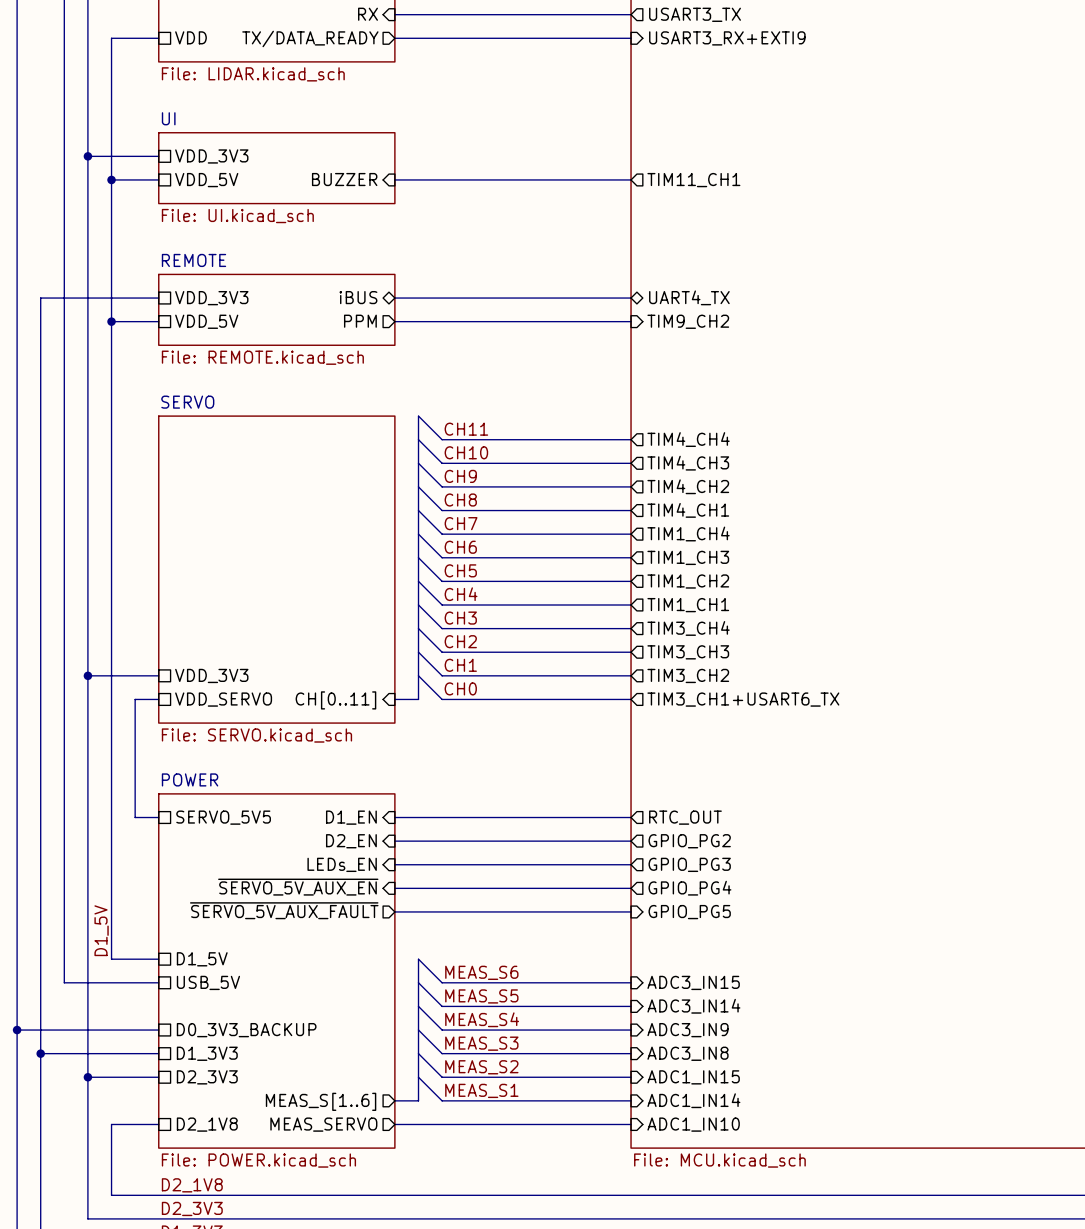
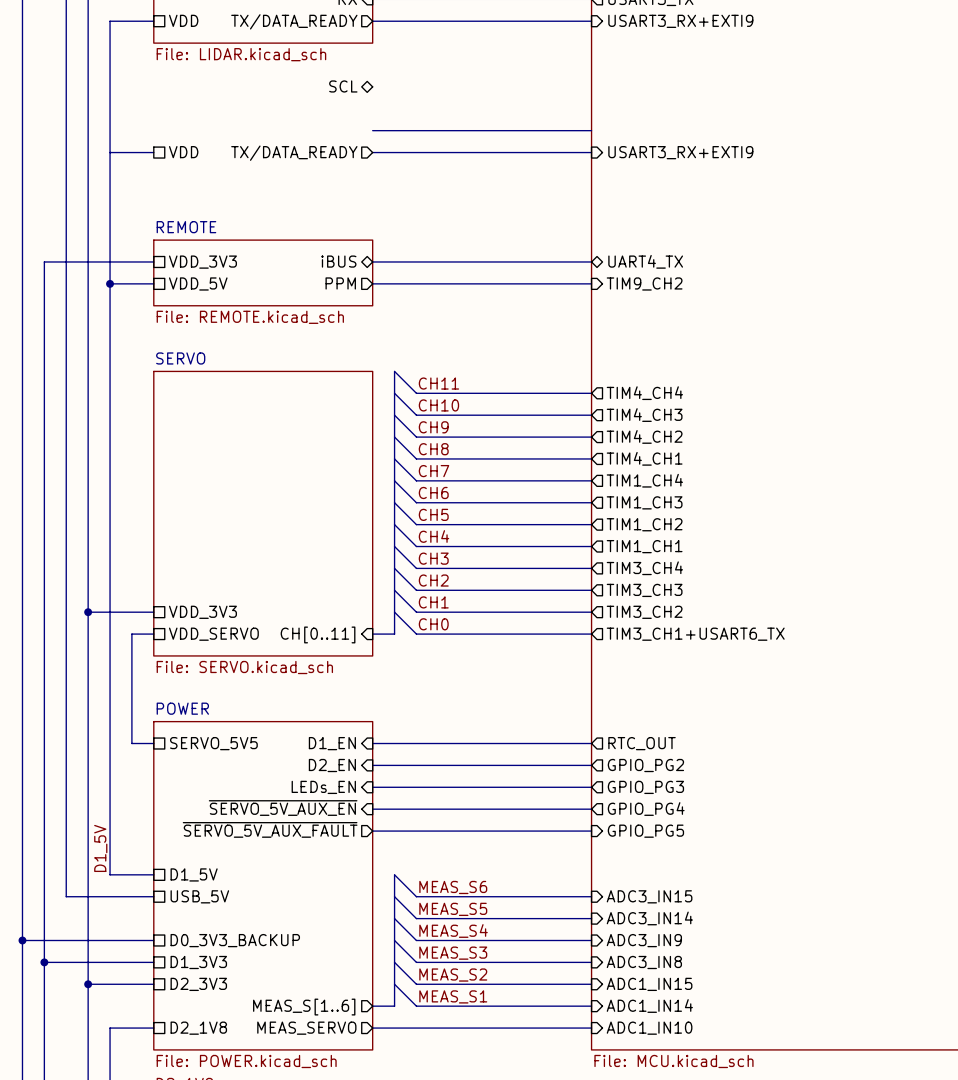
sheet pin: none -> SCL (343, 86)
wire: (87, 156) (158, 156) -> none
junction: (87, 156) -> none
sheet pin: VDD_3V3 (211, 156) -> none
wire: none -> (372, 130) (591, 130)
sheet UI: File: UI.kicad_sch (276, 168) -> none
junction: (111, 179) -> none
sheet pin shape: input (344, 179) -> output (294, 153)
sheet pin: BUZZER (344, 179) -> TX/DATA_READY (294, 153)
sheet pin: VDD_5V (206, 180) -> VDD (183, 152)
sheet pin shape: output (693, 180) -> input (680, 152)
sheet pin: TIM11_CH1 (693, 180) -> USART3_RX+EXTI9 (680, 152)

